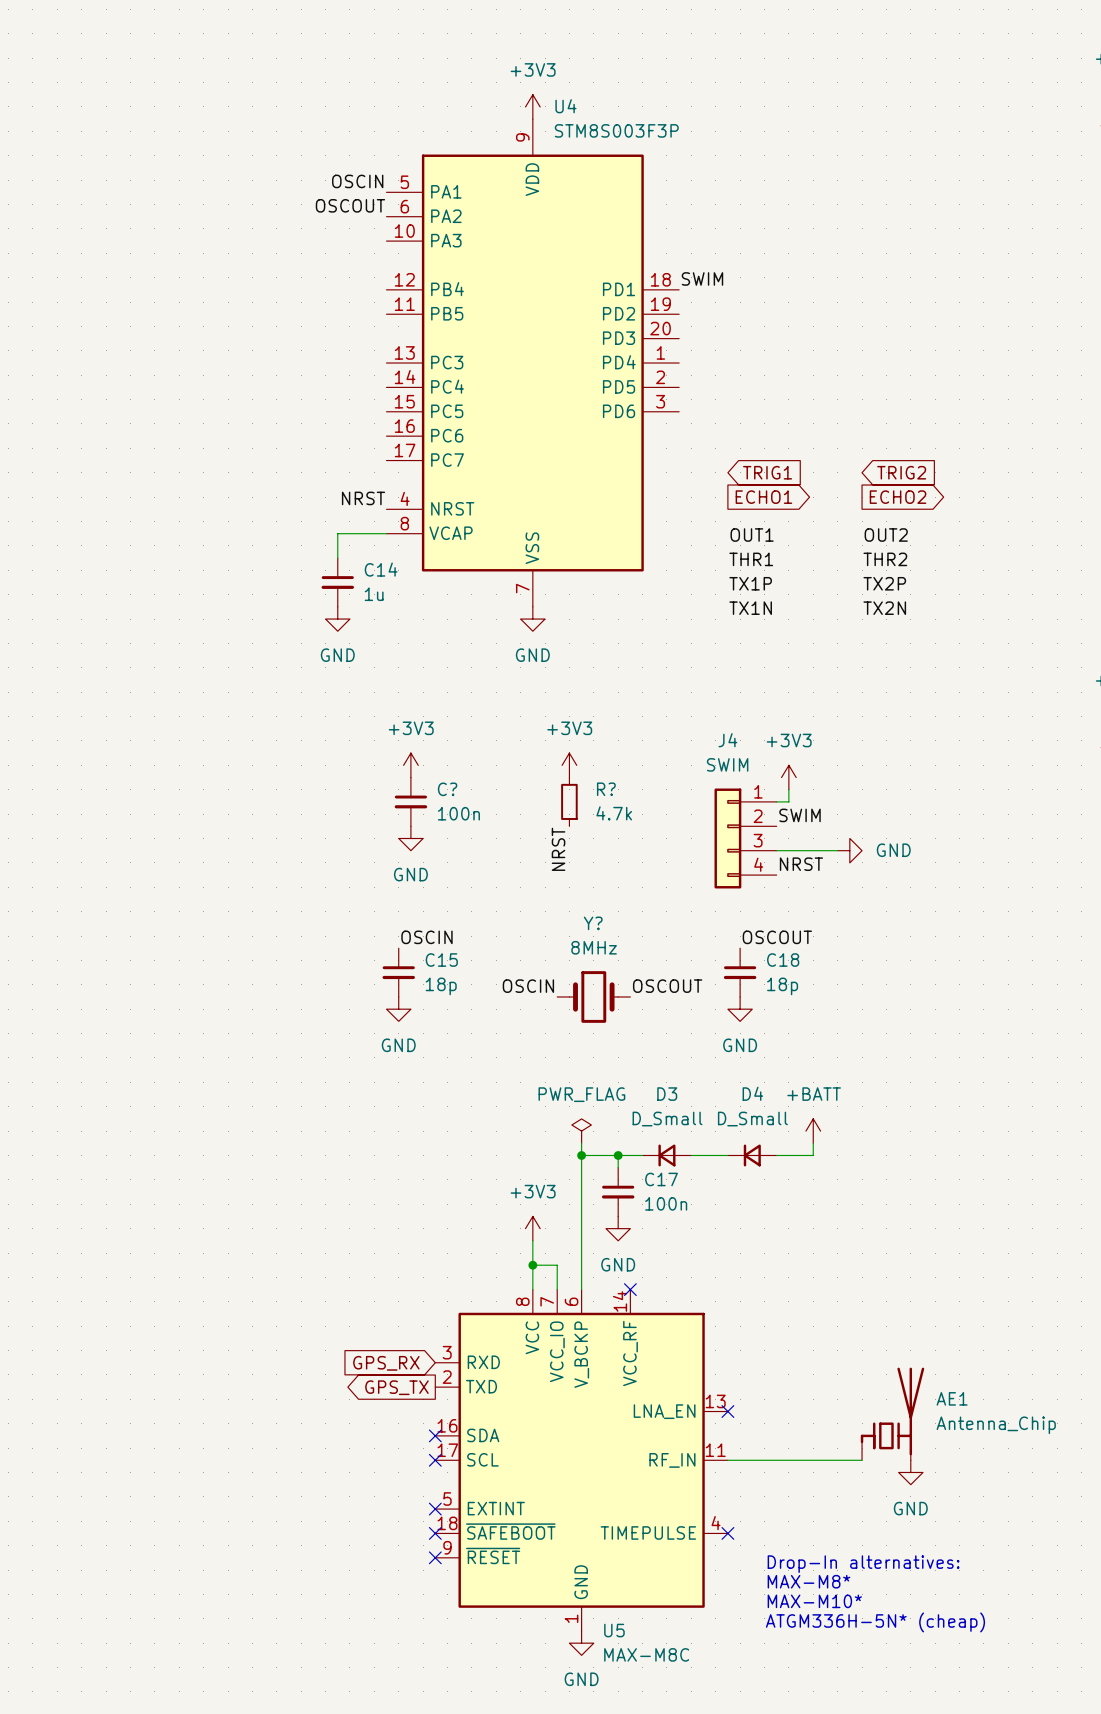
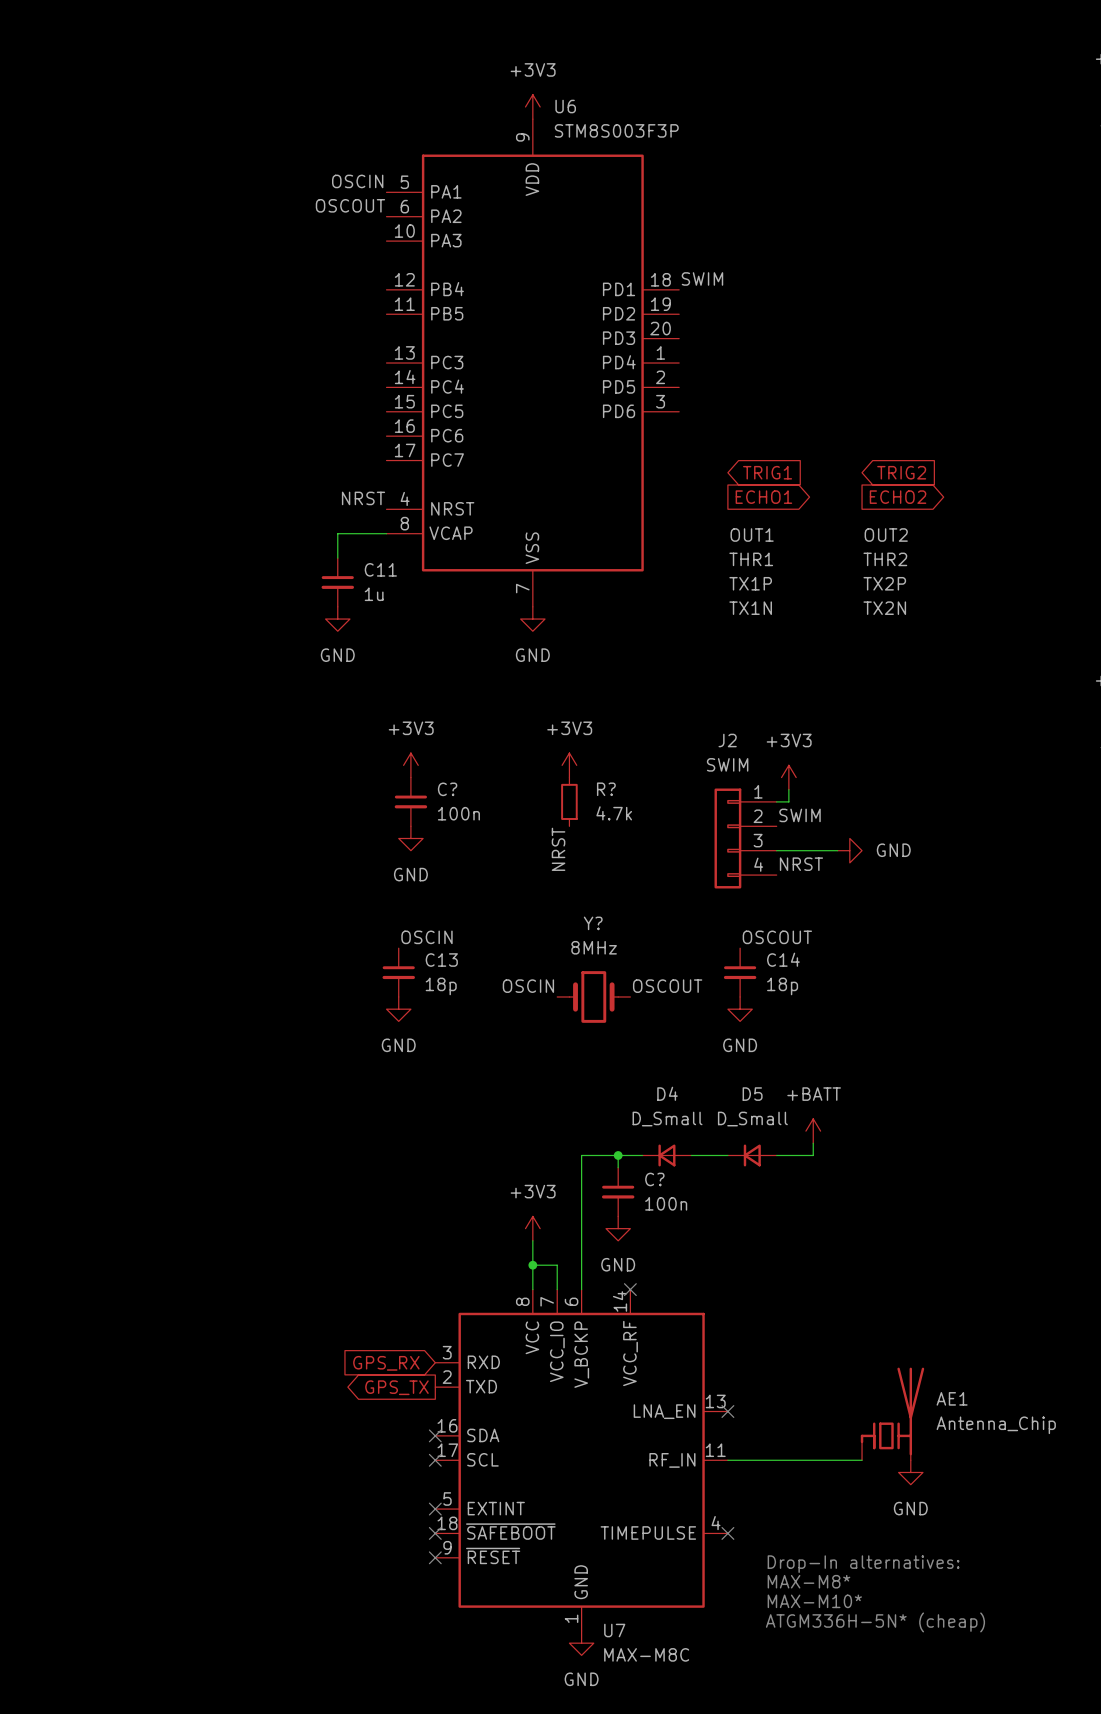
U4 name: U4 (565, 106) -> U6 (565, 106)
C14 name: C14 (381, 569) -> C11 (380, 569)
J4 name: J4 (727, 740) -> J2 (727, 740)
C15 name: C15 (441, 960) -> C13 (441, 960)
C18 name: C18 (783, 960) -> C14 (783, 959)
D4 name: D4 (752, 1093) -> D5 (752, 1094)
D3 name: D3 (667, 1094) -> D4 (667, 1093)
power symbol: PWR_FLAG (581, 1131) -> none
wire: (581, 1143) (581, 1155) -> none
junction: (581, 1155) -> none
C17 name: C17 (661, 1179) -> C? (654, 1179)
U5 name: U5 (614, 1630) -> U7 (614, 1630)

